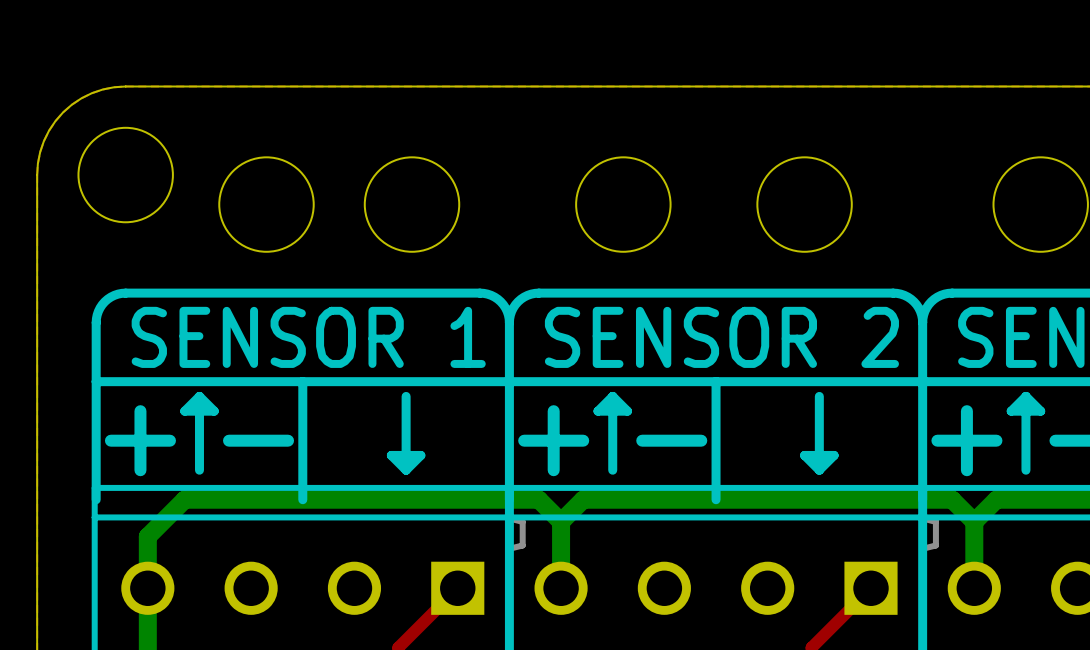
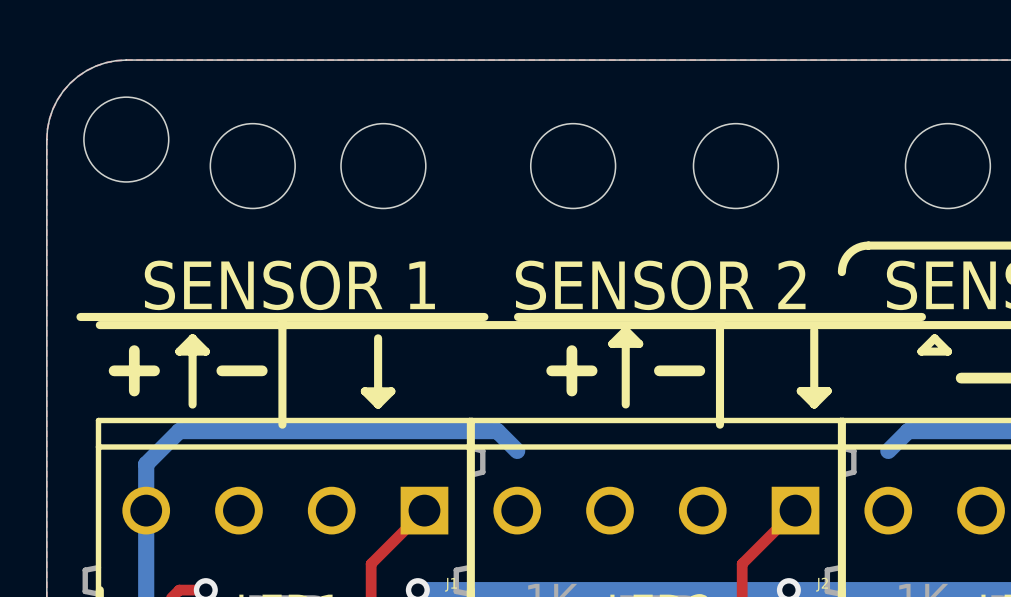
line: (509, 322) (509, 499) -> none
line: (509, 322) (507, 311) (503, 304) (494, 297) (483, 293) (125, 293) (114, 295) (102, 304) (96, 318) (96, 499) -> none
line: (509, 322) (511, 311) (515, 304) (524, 297) (535, 293) (893, 293) (904, 295) (916, 304) (922, 318) (922, 499) -> none
line: none -> (80, 316) (484, 316)
line: none -> (282, 316) (282, 424)
line: none -> (518, 316) (921, 316)
line: none -> (719, 316) (719, 424)
line: (302, 381) (302, 499) -> none
line: (716, 381) (716, 499) -> none
line: none -> (625, 330) (625, 404)
line: none -> (814, 330) (814, 404)
line: (612, 396) (627, 411) (597, 411) (612, 396) -> (625, 330) (639, 343) (612, 343) (625, 330)
line: (612, 396) (612, 470) -> none
line: (819, 396) (819, 470) -> none
line: (1025, 396) (1025, 470) -> none
line: none -> (134, 350) (134, 391)
line: none -> (571, 350) (571, 391)
line: (140, 411) (140, 470) -> none
line: (553, 411) (553, 470) -> none
line: (966, 411) (966, 470) -> none
line: none -> (114, 370) (154, 370)
line: none -> (221, 370) (262, 370)
line: none -> (551, 370) (592, 370)
line: none -> (659, 370) (699, 370)
line: (110, 440) (169, 440) -> none
line: (229, 440) (288, 440) -> none
line: (524, 440) (583, 440) -> none
line: (642, 440) (701, 440) -> none
line: (937, 440) (996, 440) -> none
line: (819, 470) (834, 455) (804, 455) (819, 470) -> (814, 404) (827, 391) (800, 391) (814, 404)
bottom track: (561, 588) (561, 521) (583, 499) (952, 499) (974, 521) (974, 588) -> none

